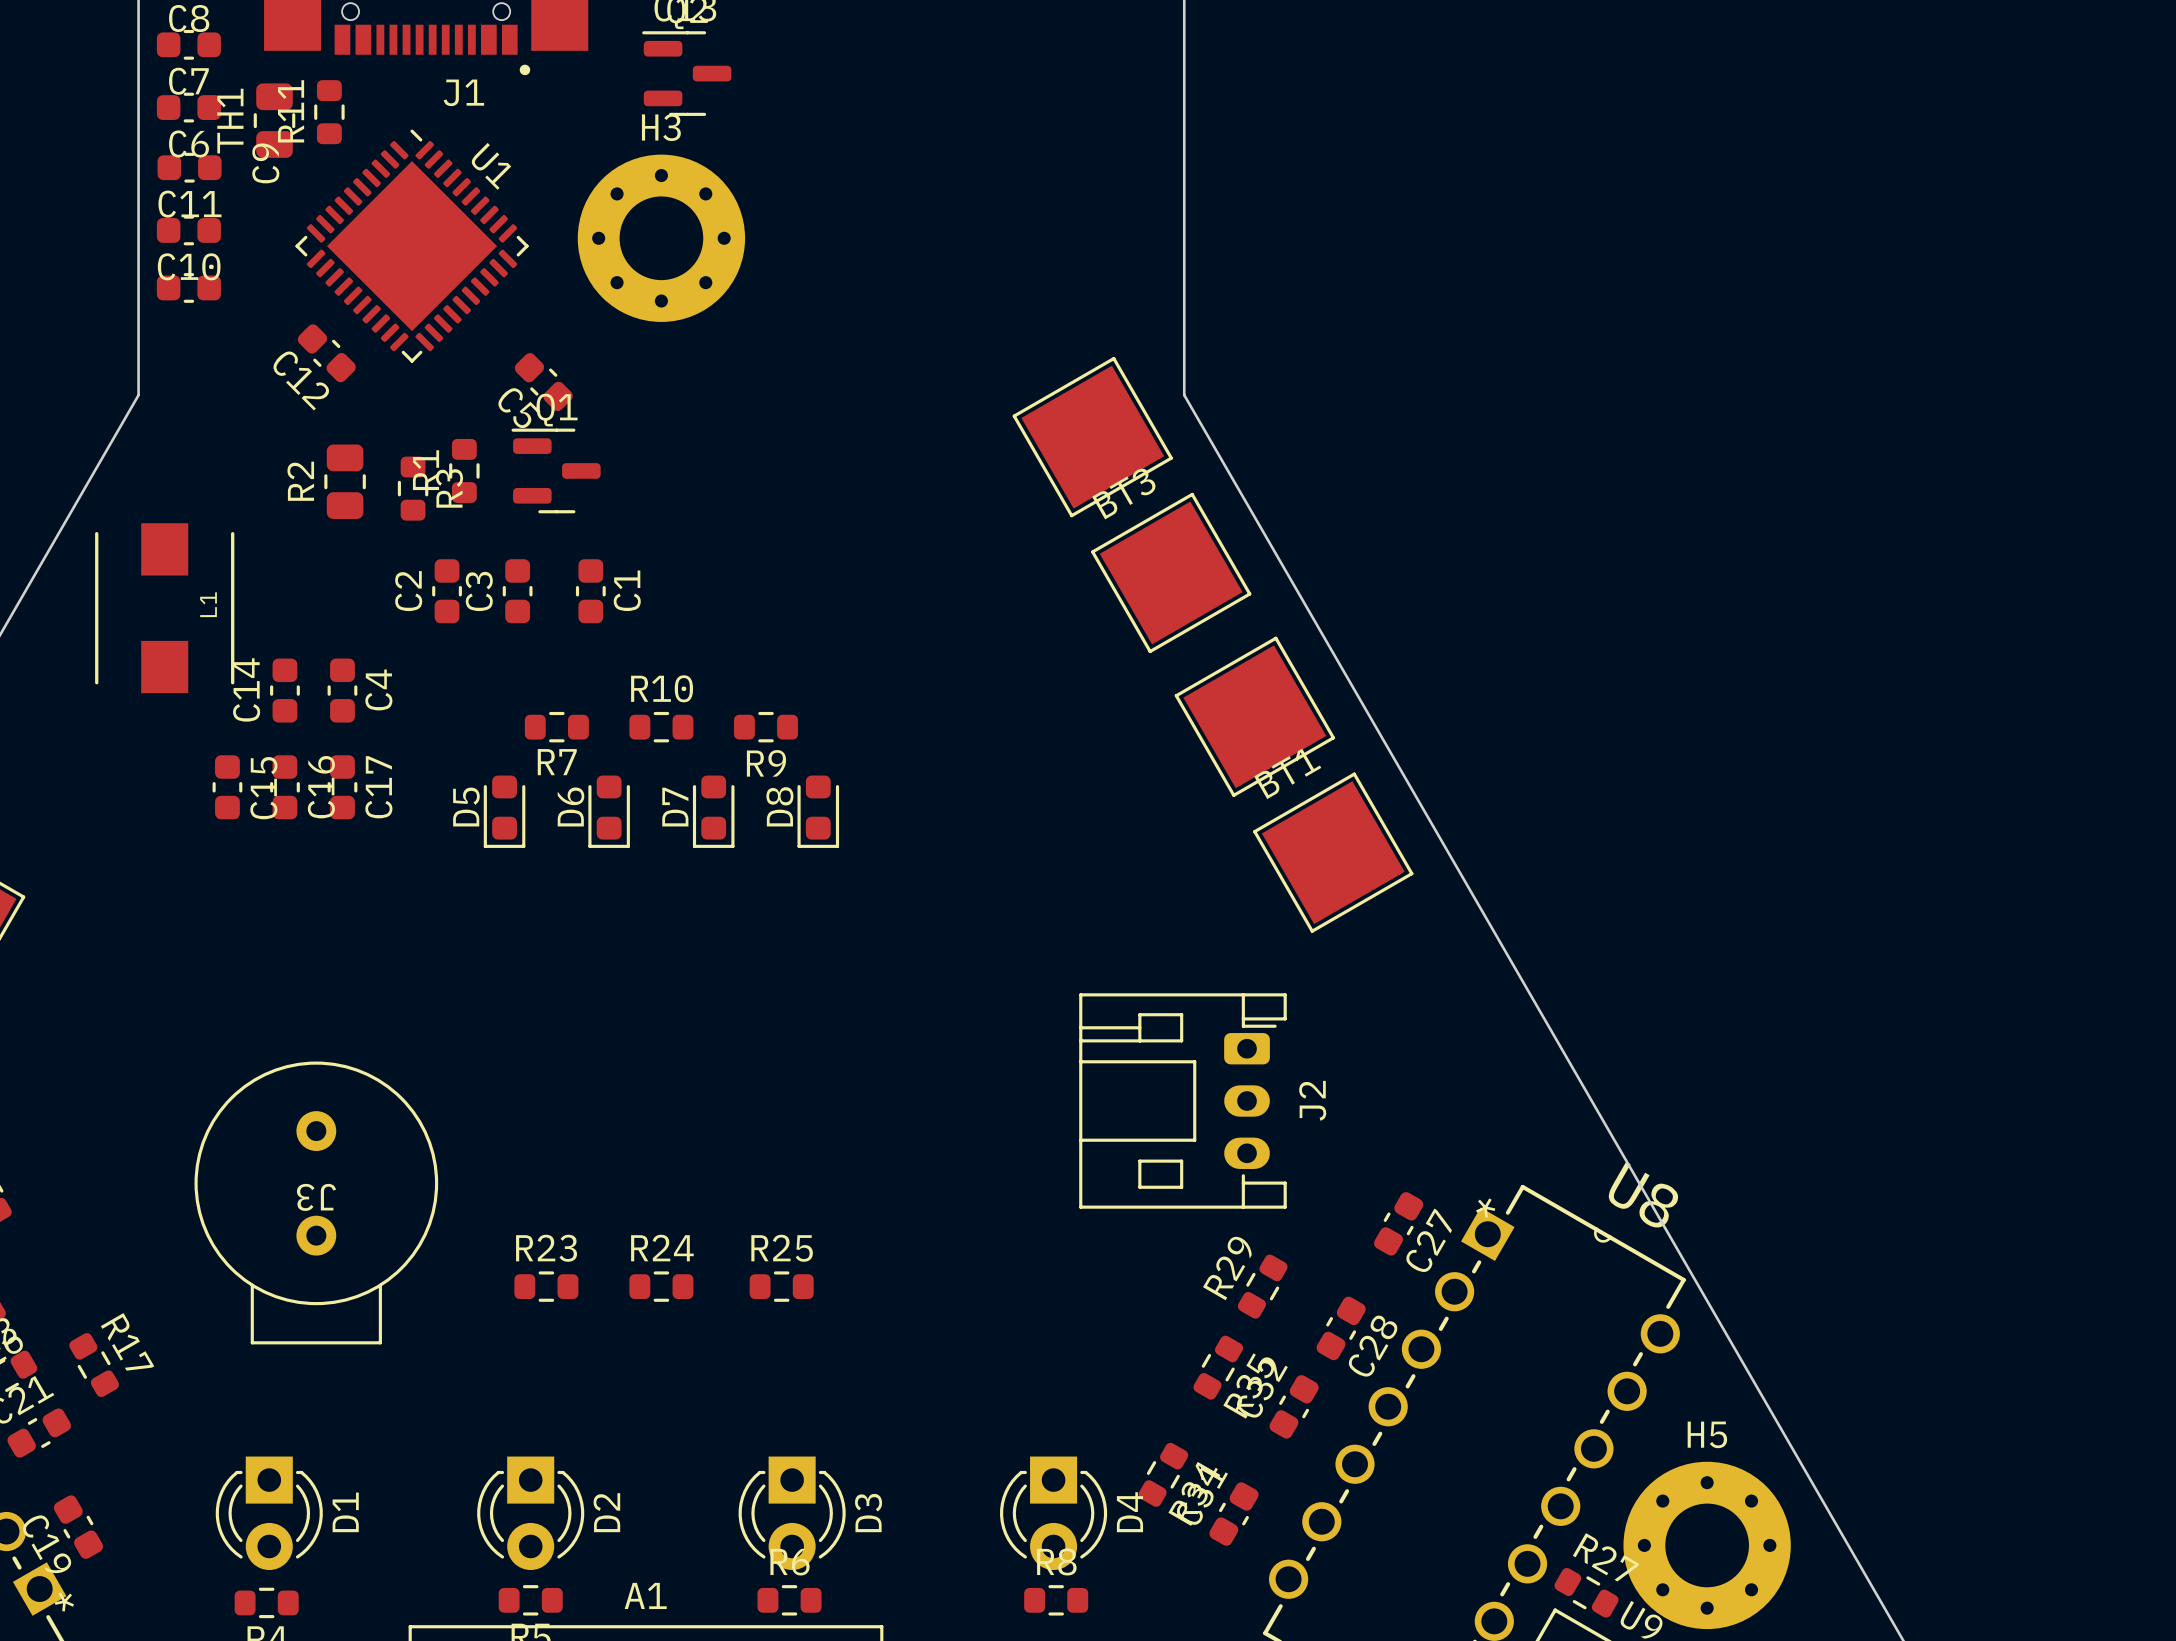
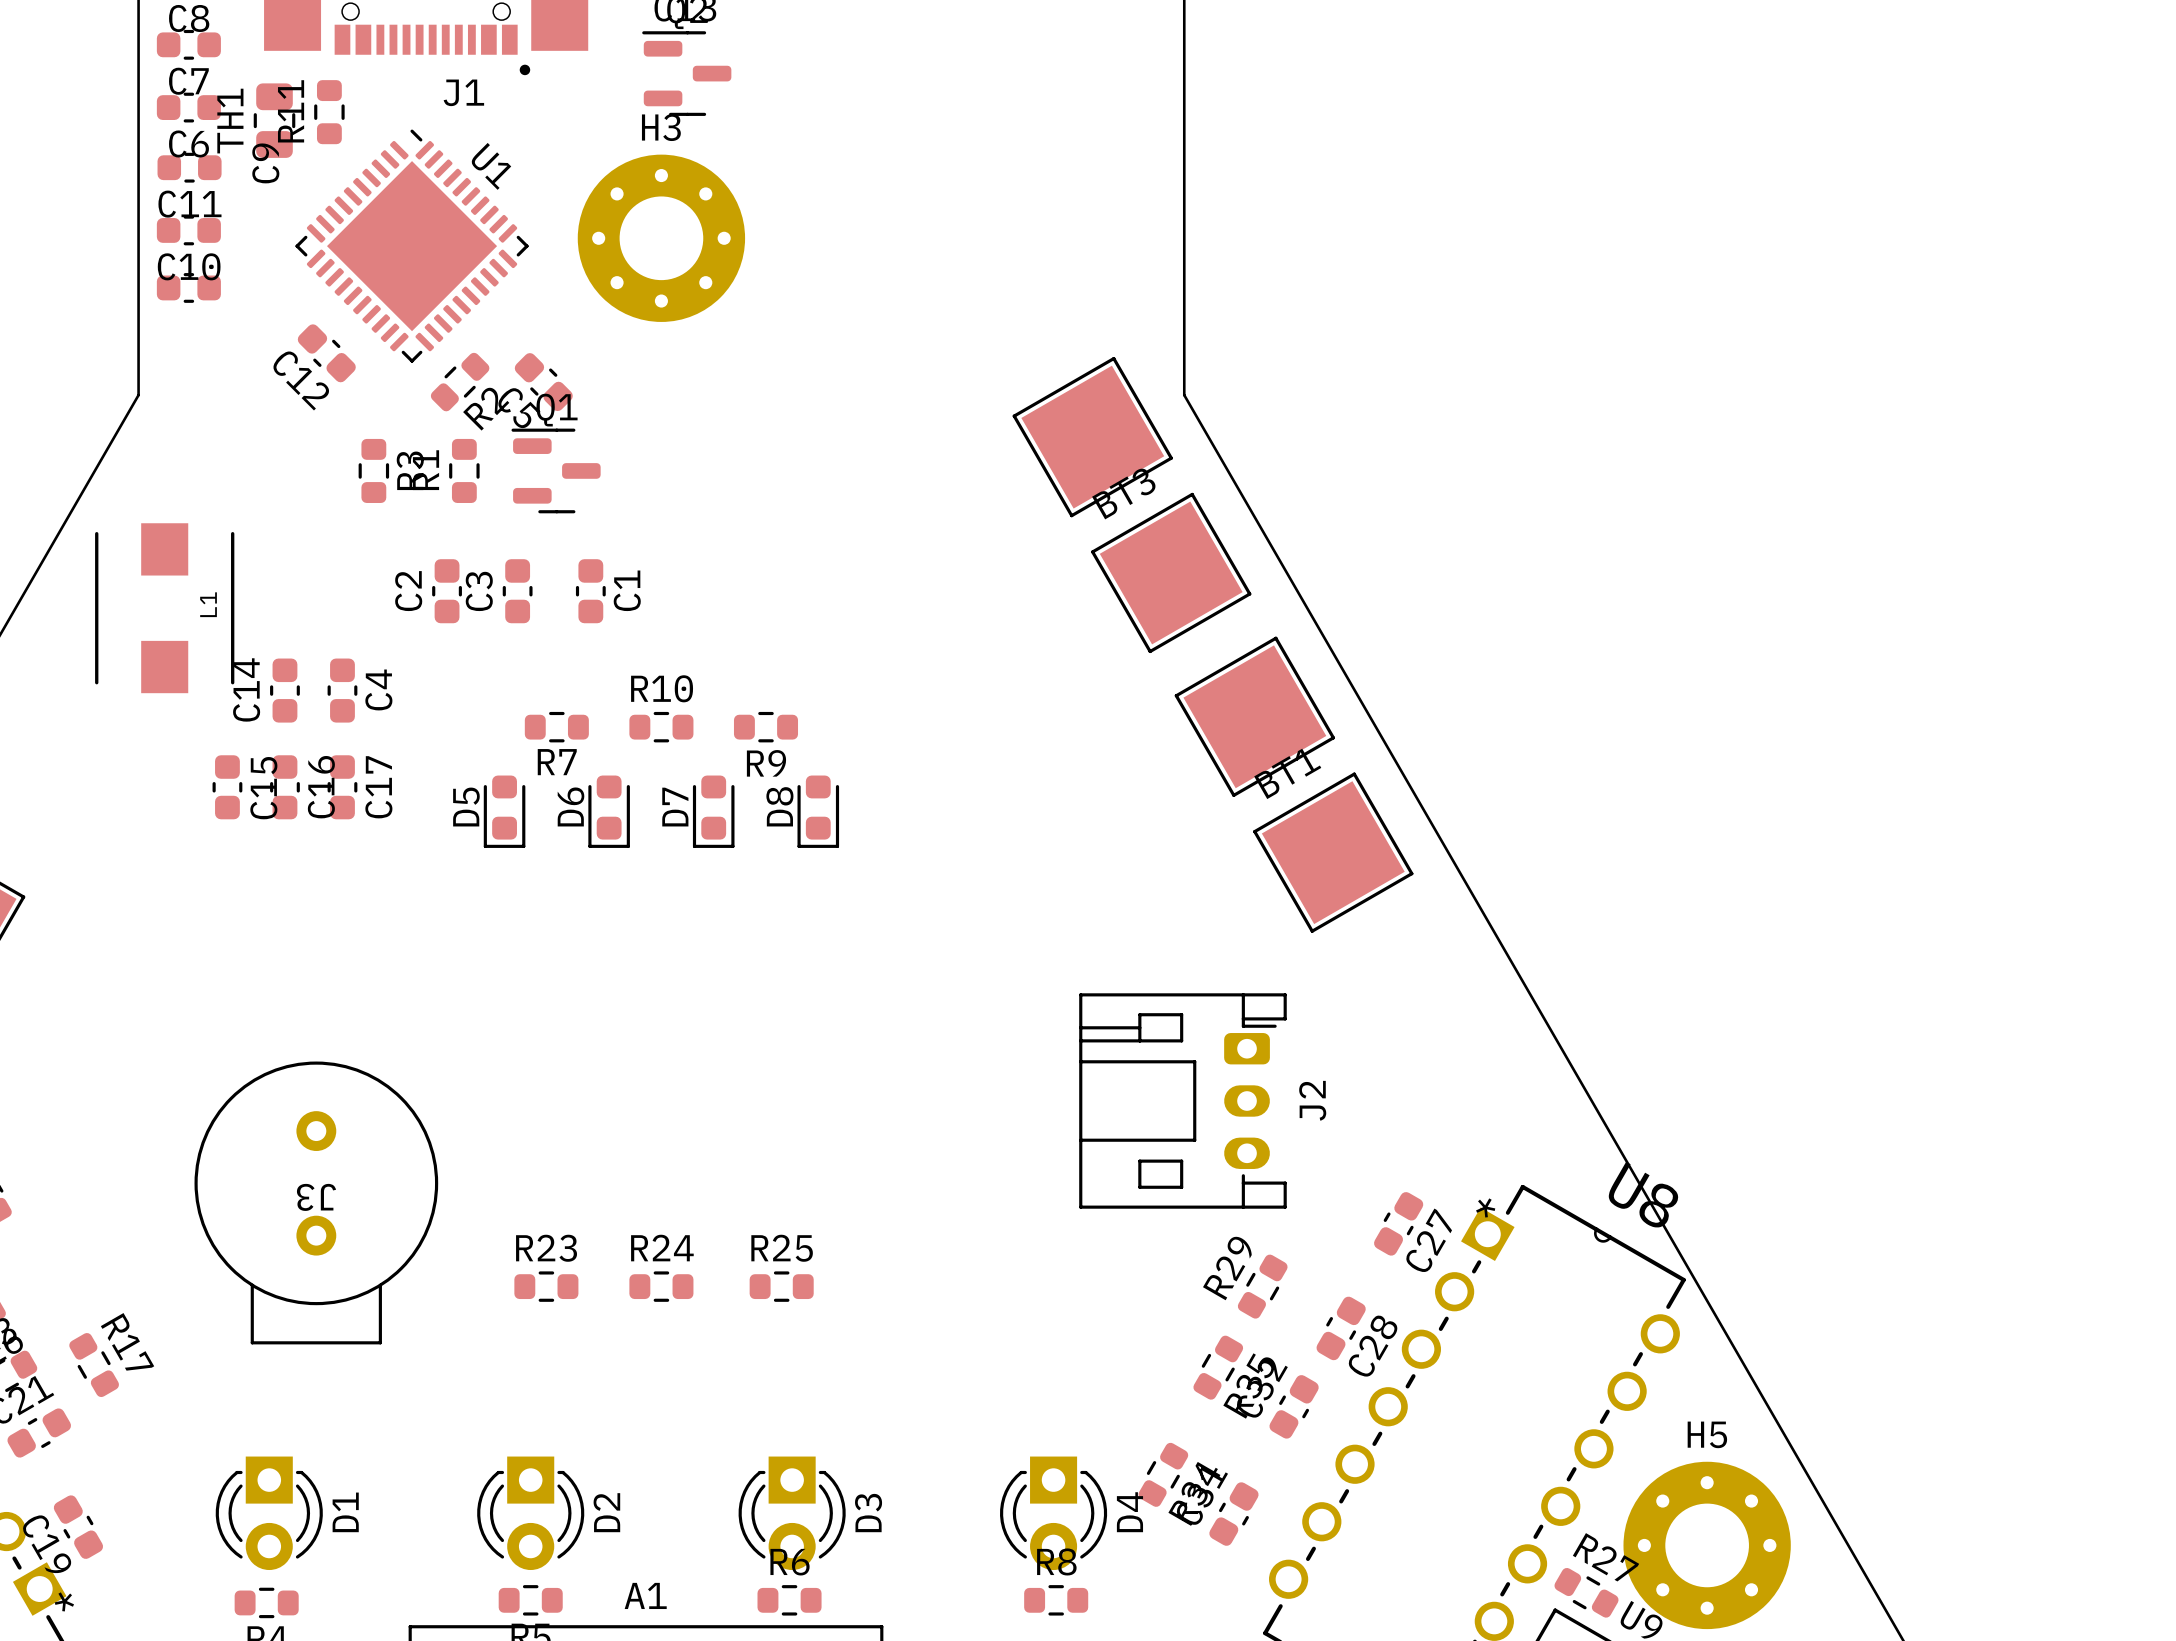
R2 footprint: [324, 444, 366, 519] -> [430, 352, 490, 412]
R2 name position: R2 (300, 481) -> R2 (486, 409)
R3 position: (413, 488) -> (373, 470)

